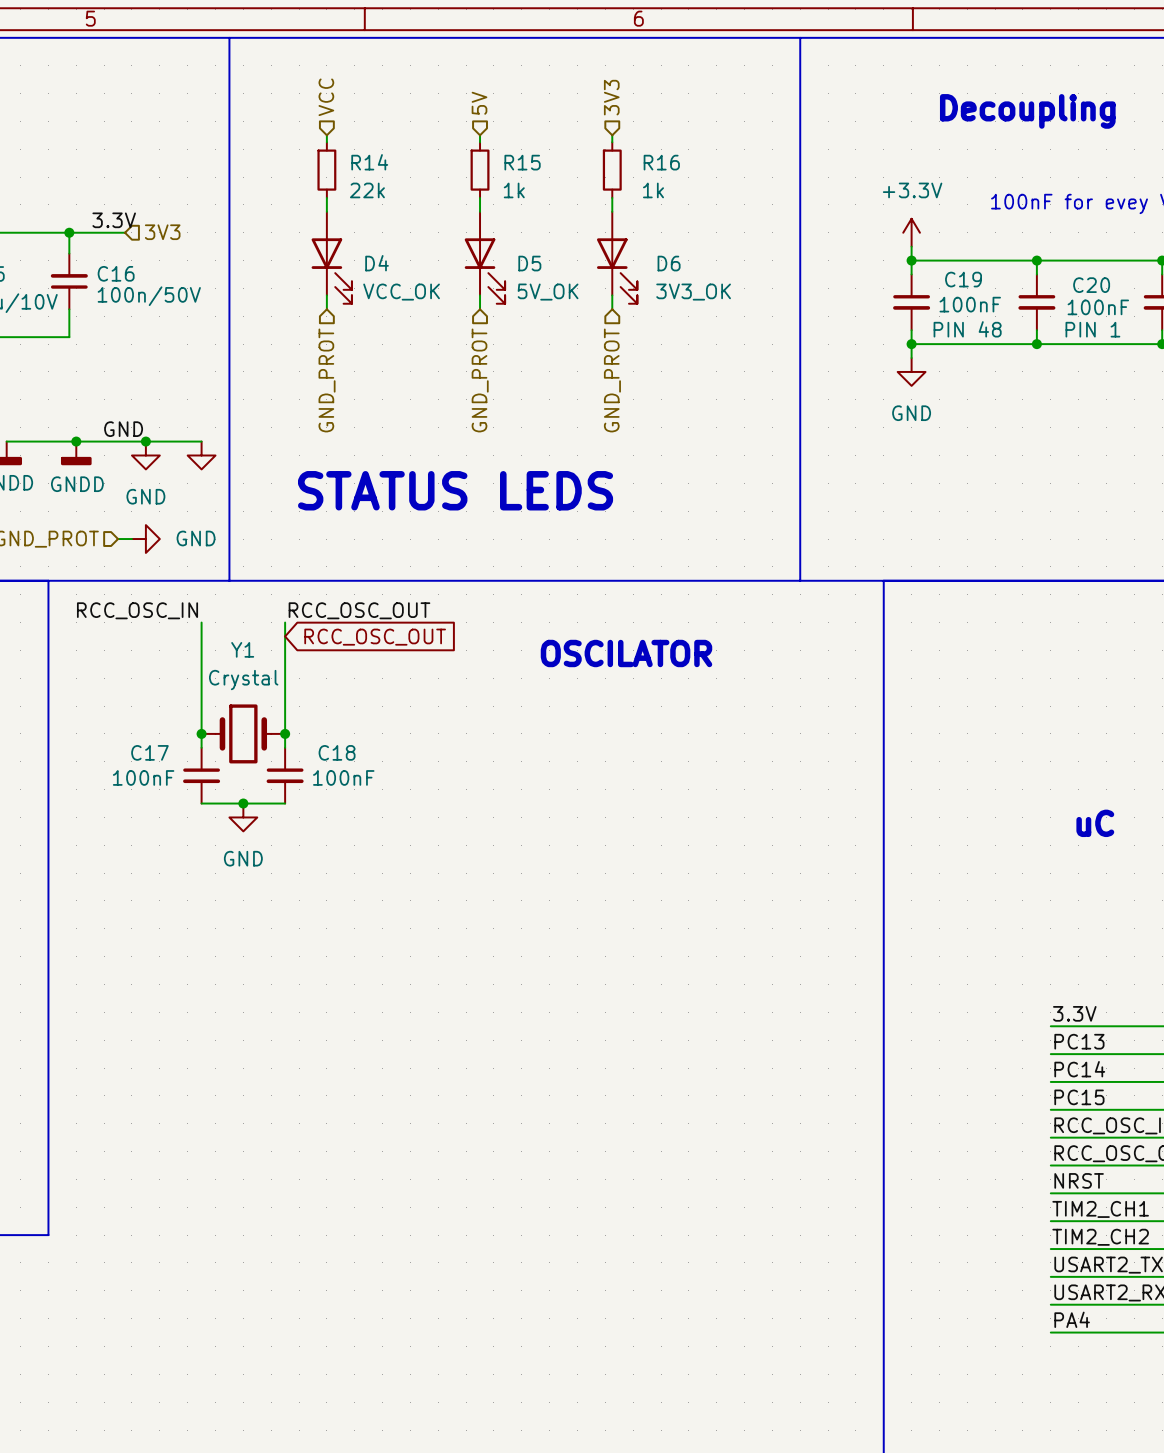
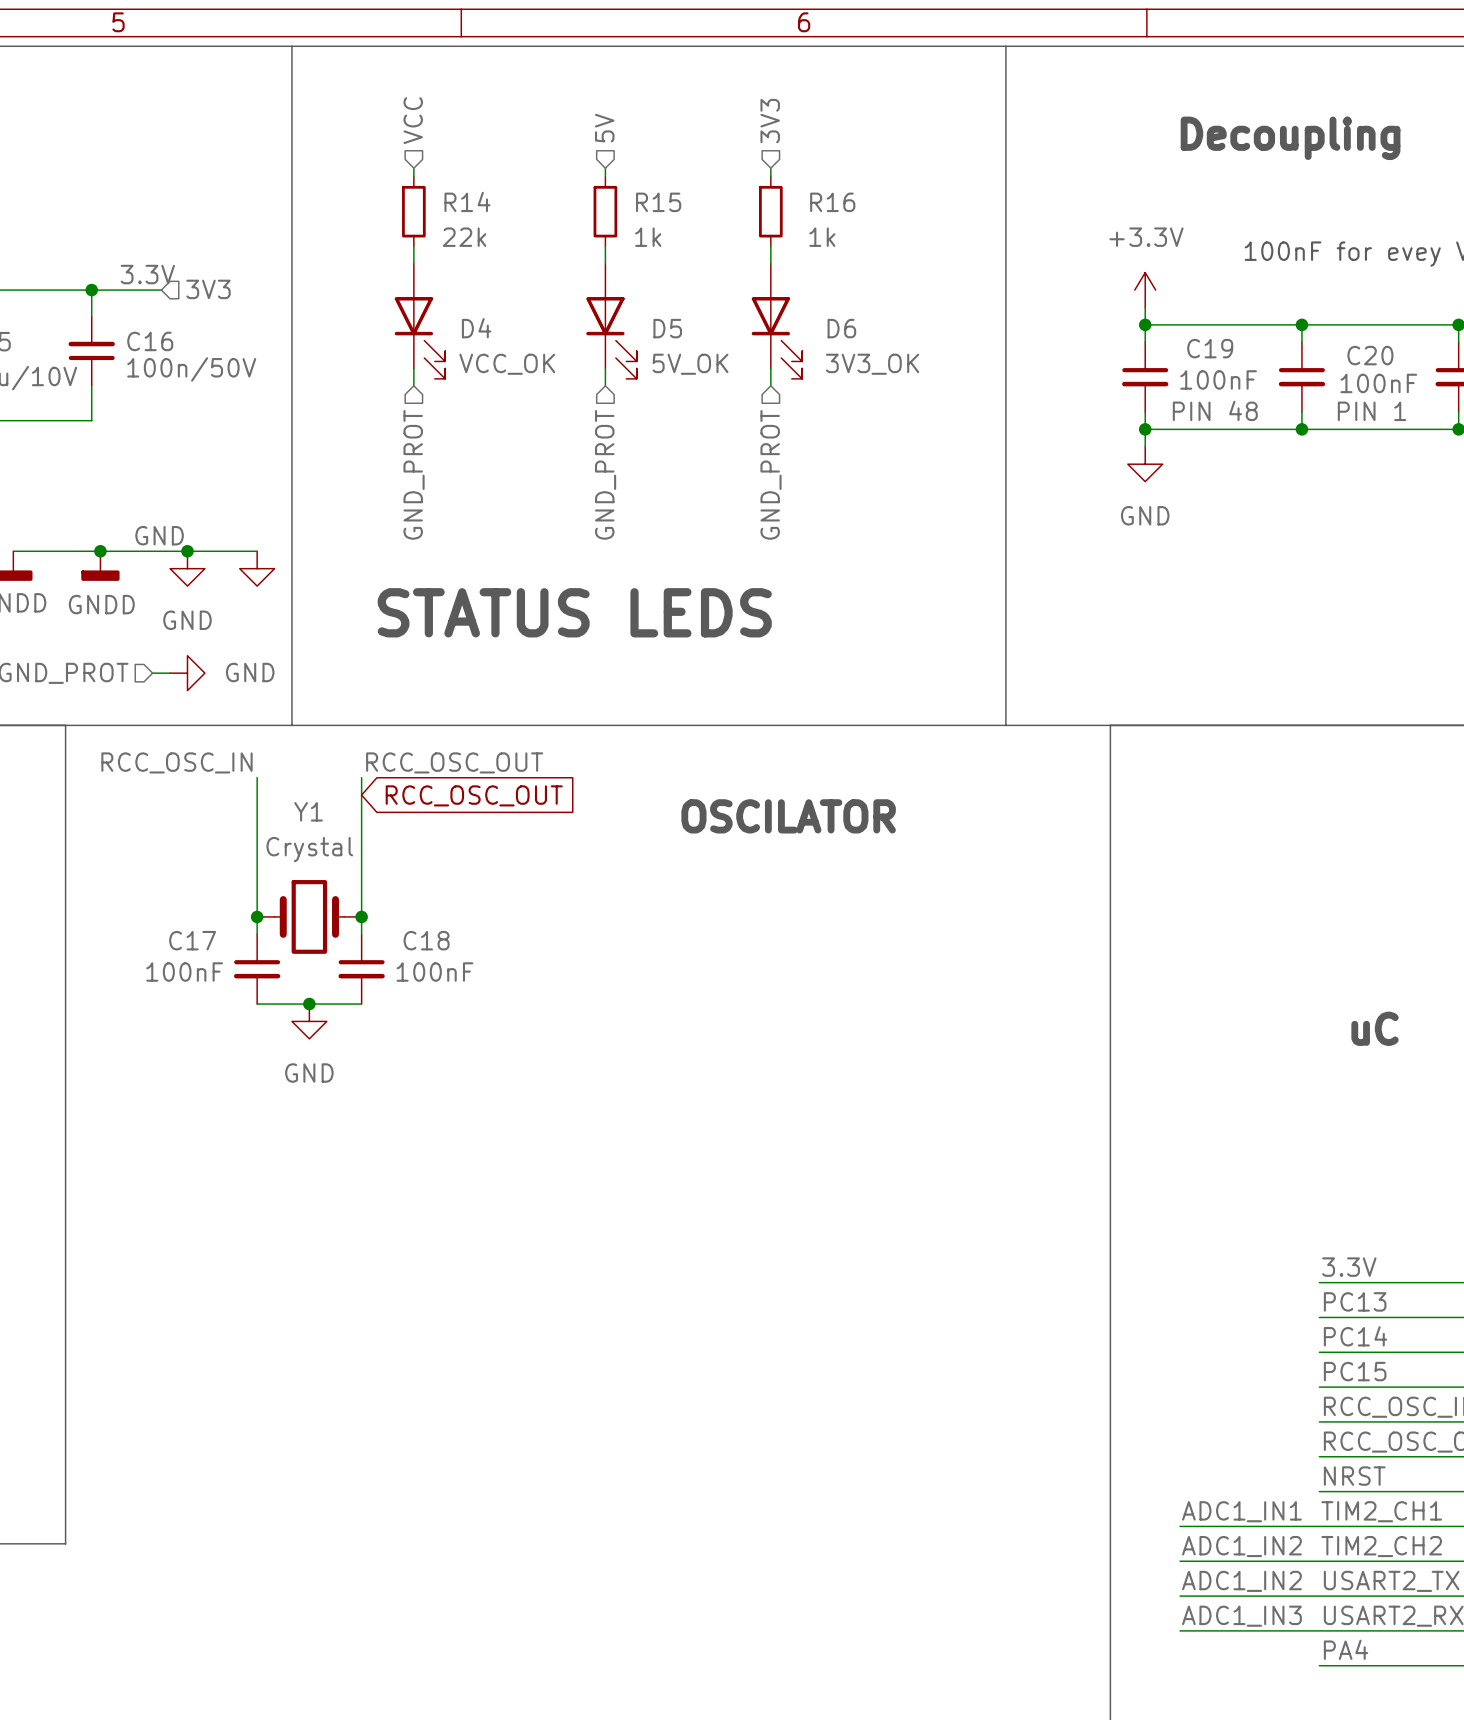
label: none -> ADC1_IN1 (1241, 1511)
wire: none -> (1180, 1526) (1319, 1526)
label: none -> ADC1_IN2 (1241, 1546)
wire: none -> (1180, 1561) (1319, 1561)
label: none -> ADC1_IN2 (1241, 1581)
wire: none -> (1180, 1596) (1319, 1596)
label: none -> ADC1_IN3 (1241, 1616)
wire: none -> (1180, 1630) (1319, 1630)

